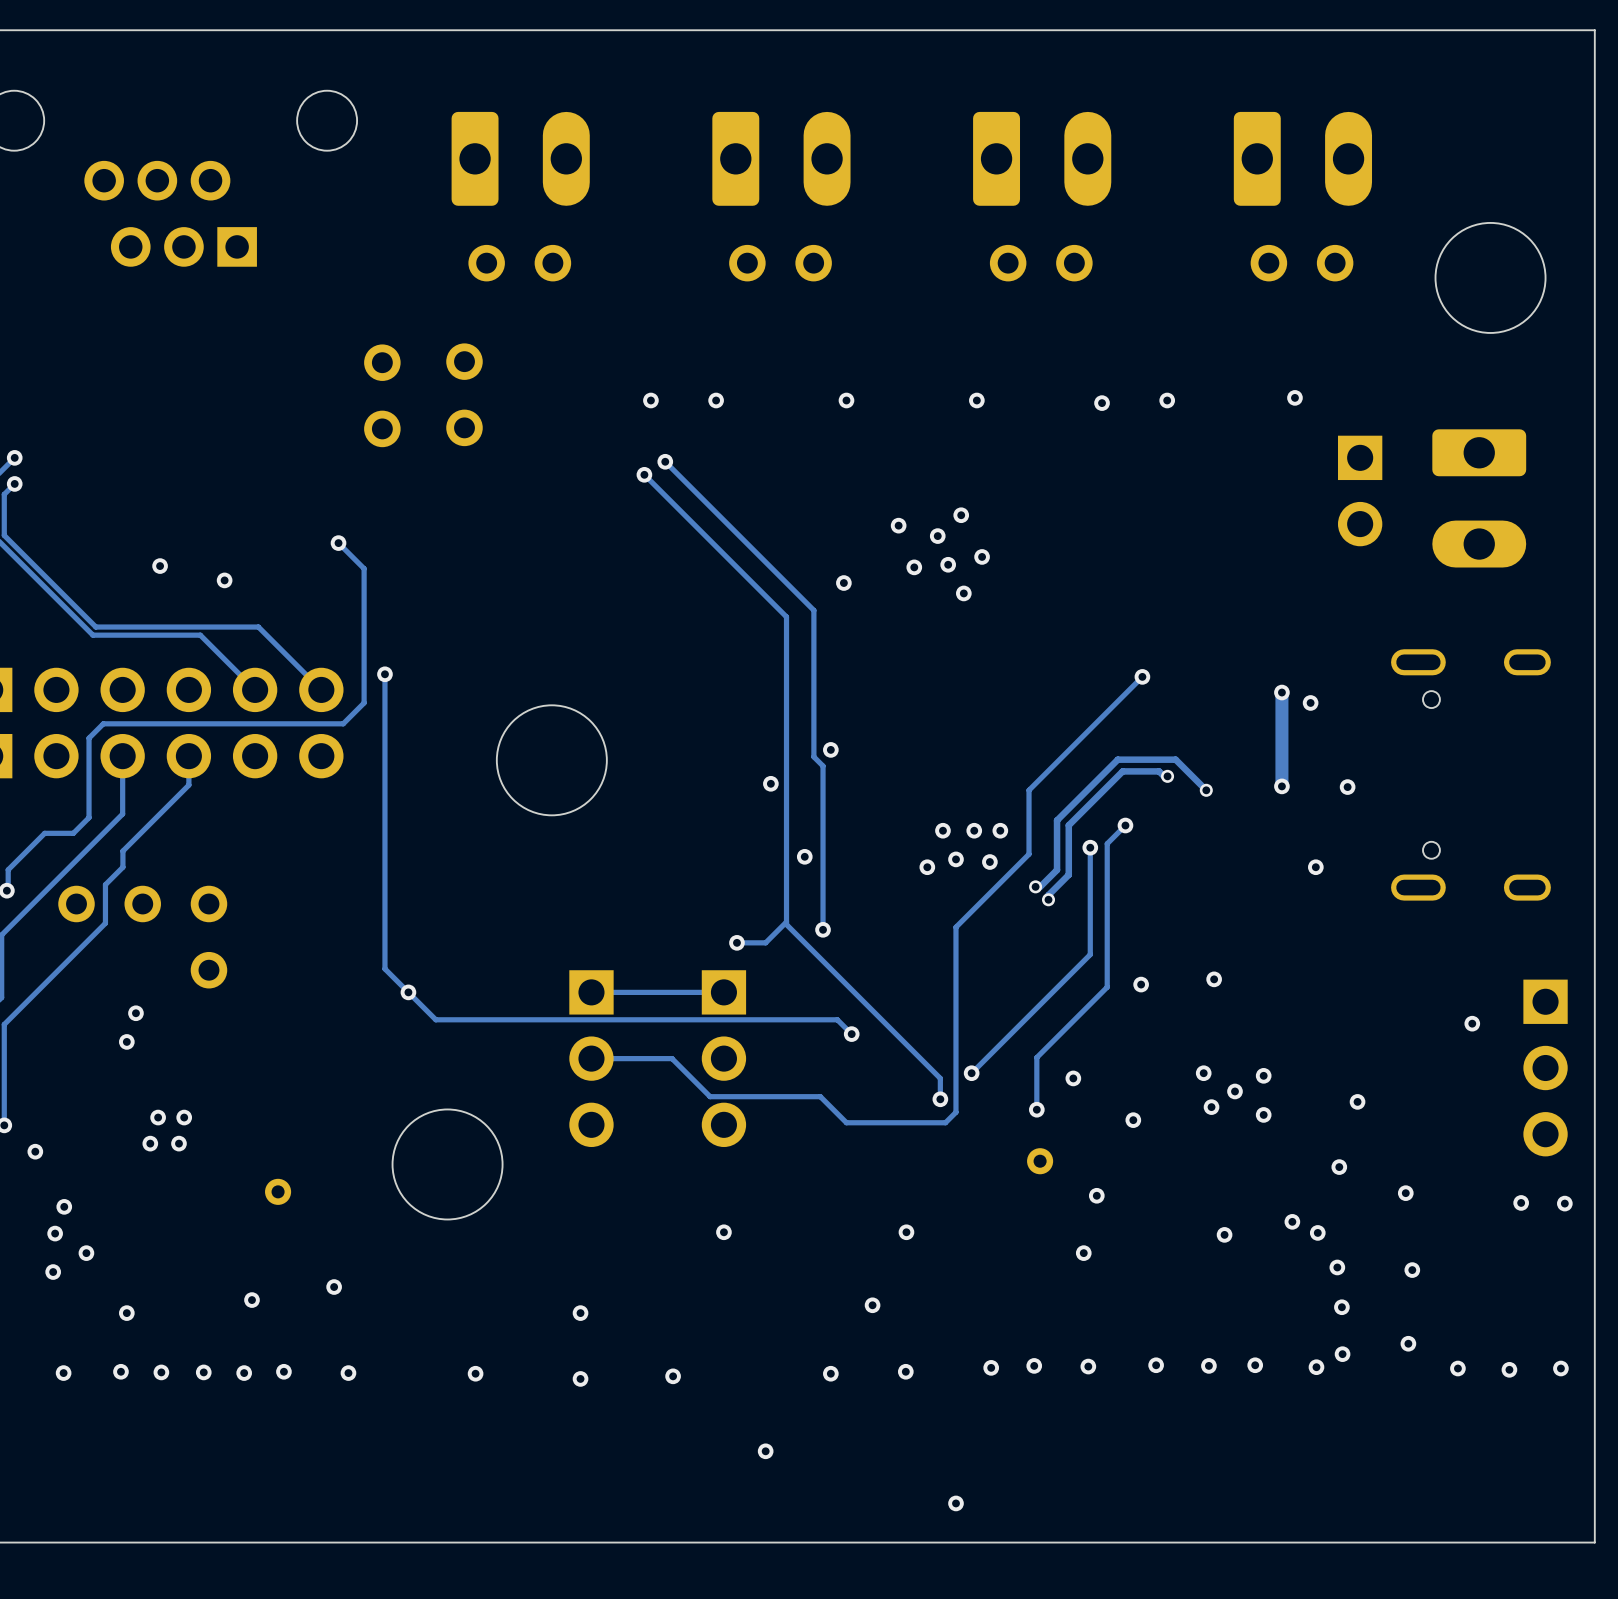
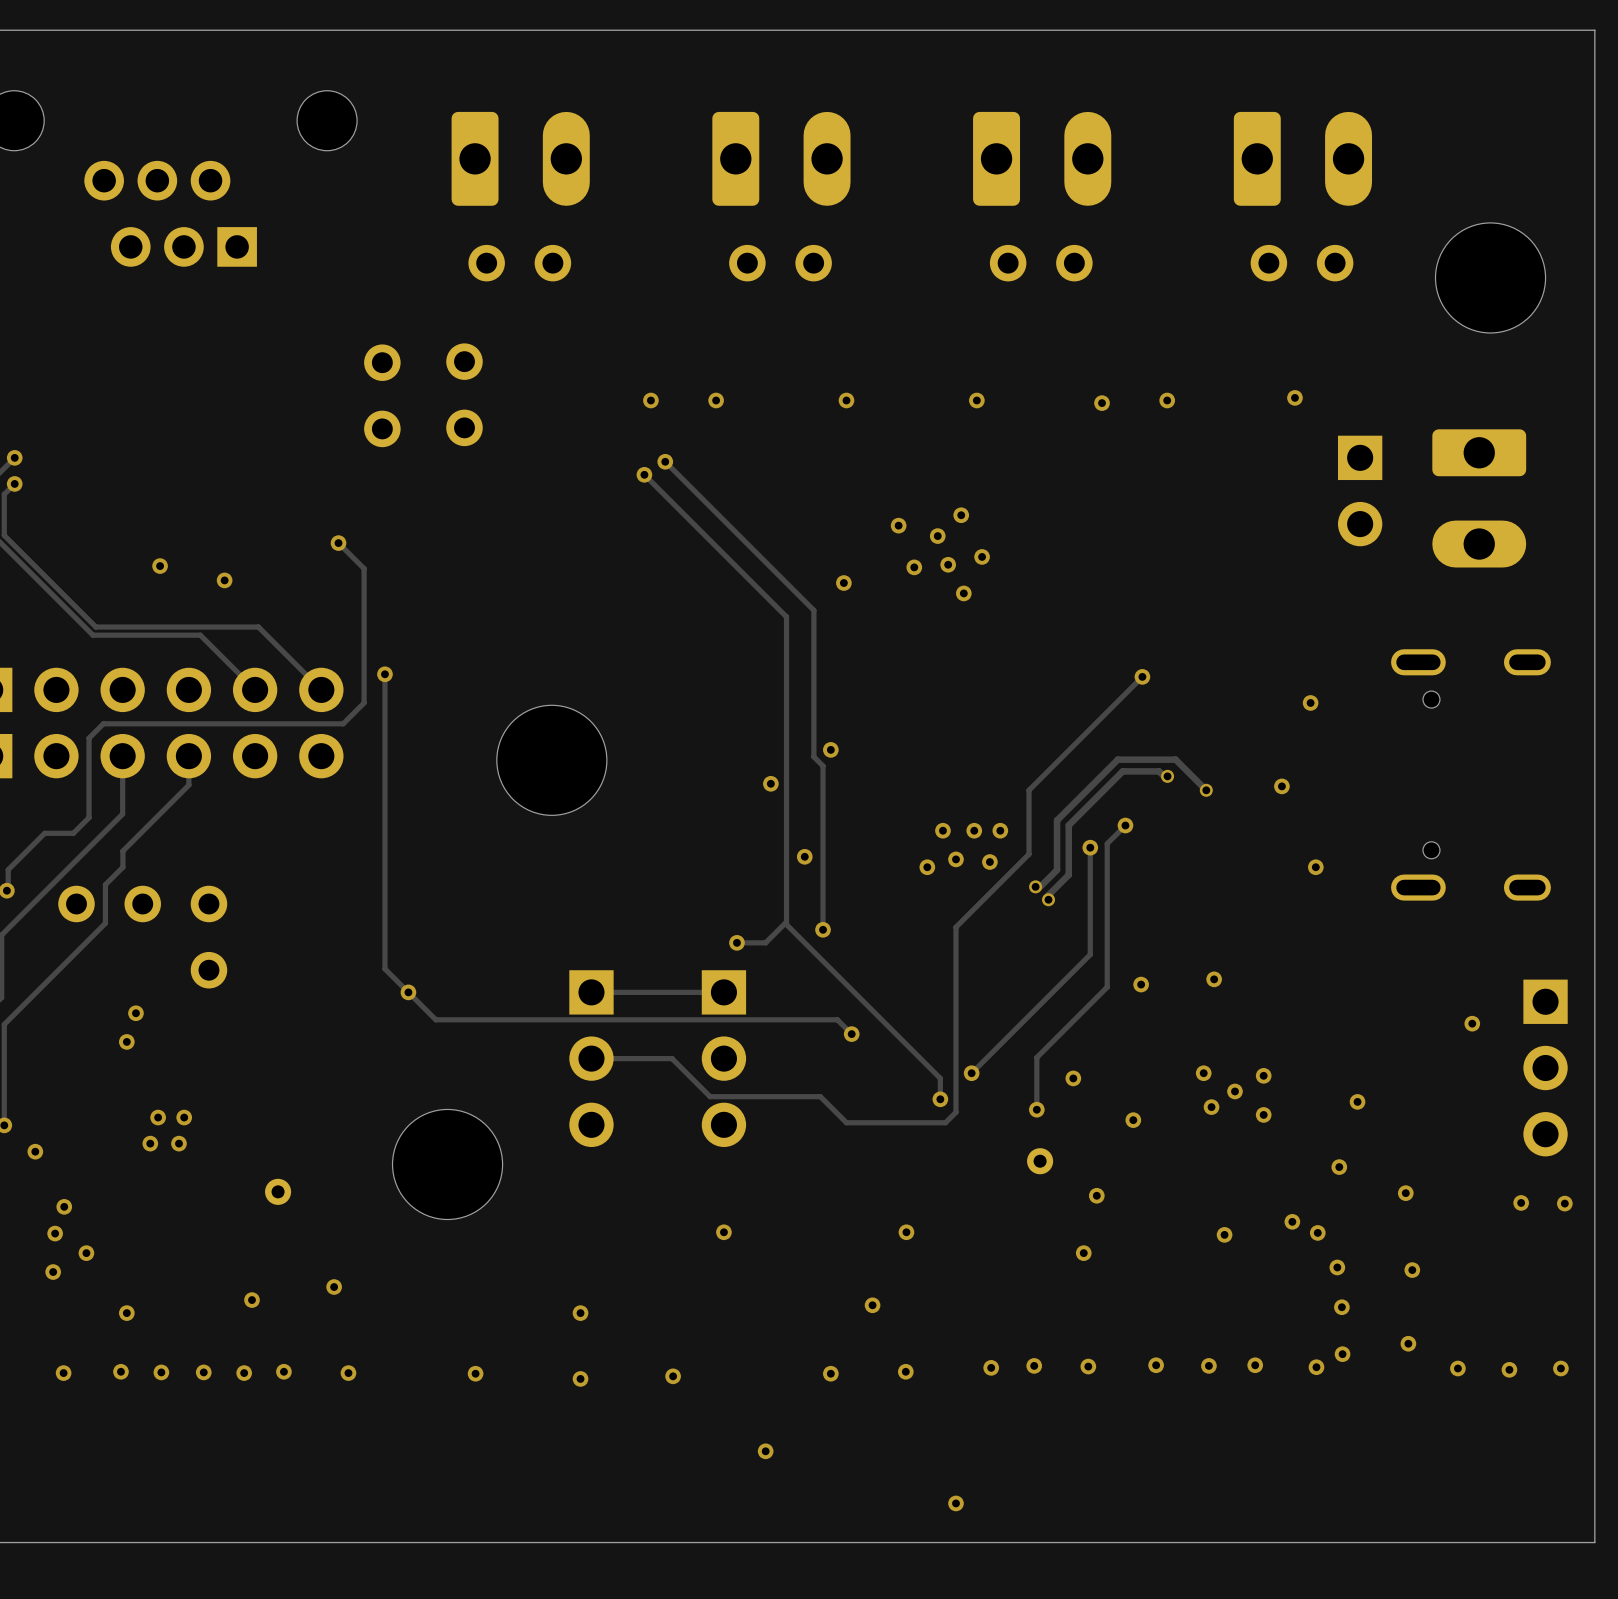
track: (1281, 692) (1281, 786) -> none
via: (1281, 692) -> none
via: (1347, 787) -> none

